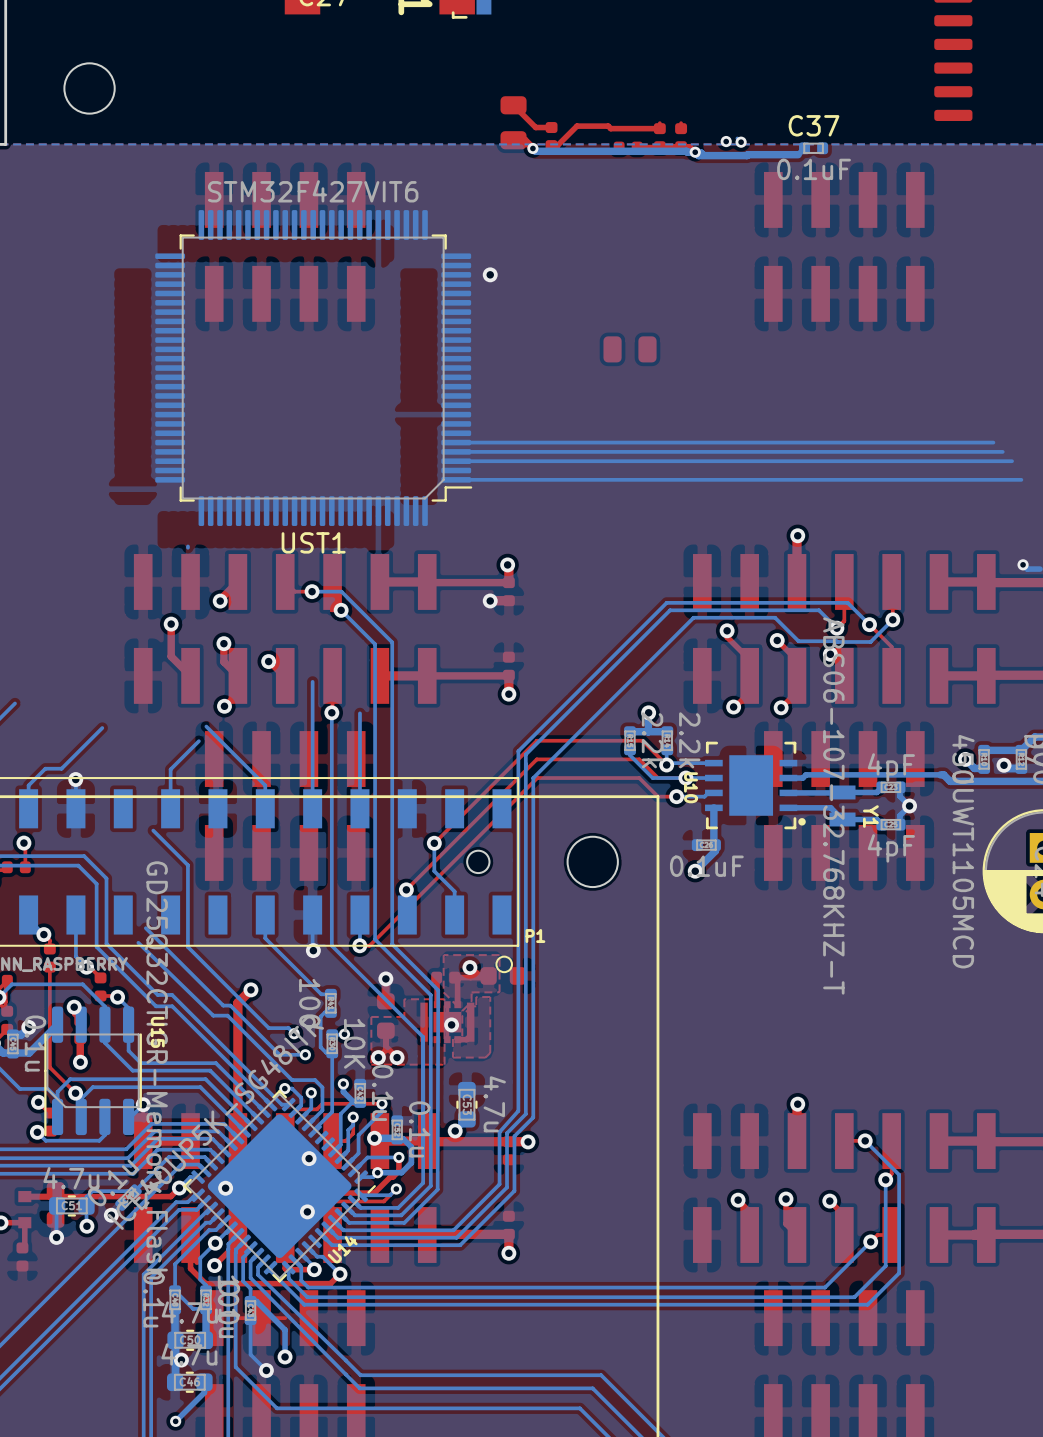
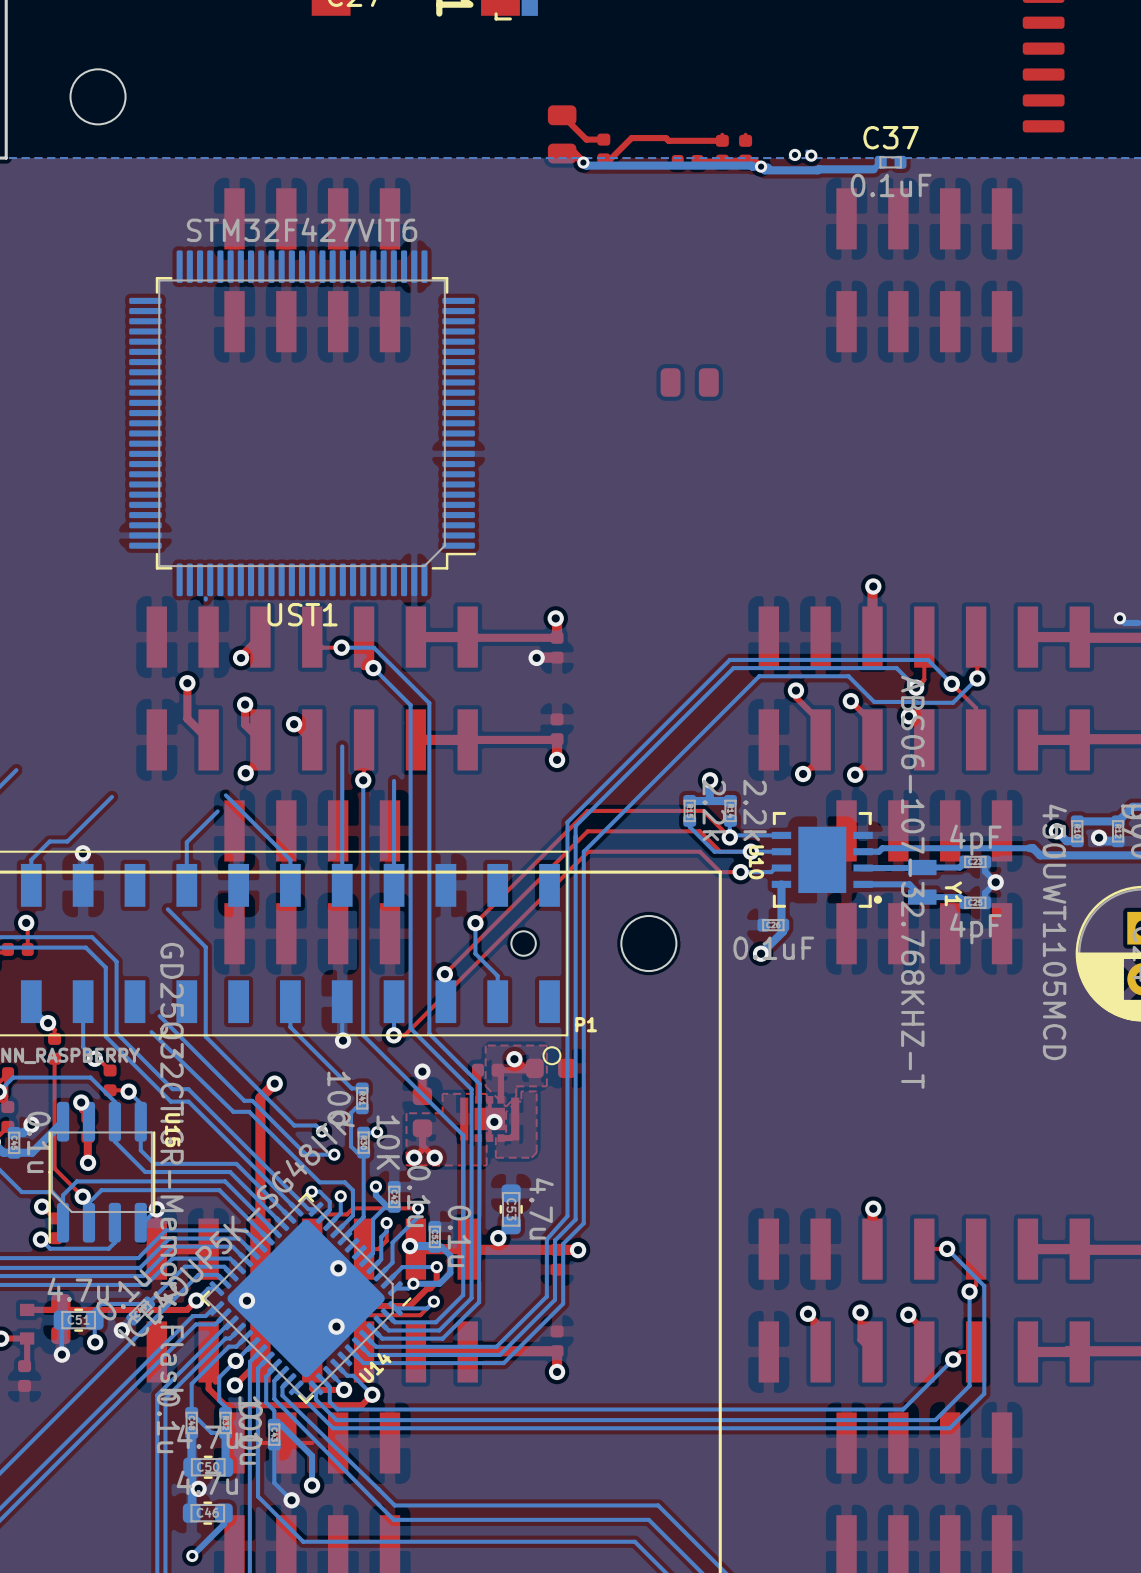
via: (490, 274) -> none
UST1 position: (313, 368) -> (302, 423)
bottom track: (993, 442) (456, 442) -> none
bottom track: (1002, 451) (456, 451) -> none
bottom track: (1012, 461) (456, 461) -> none
bottom track: (1021, 479) (456, 479) -> none

